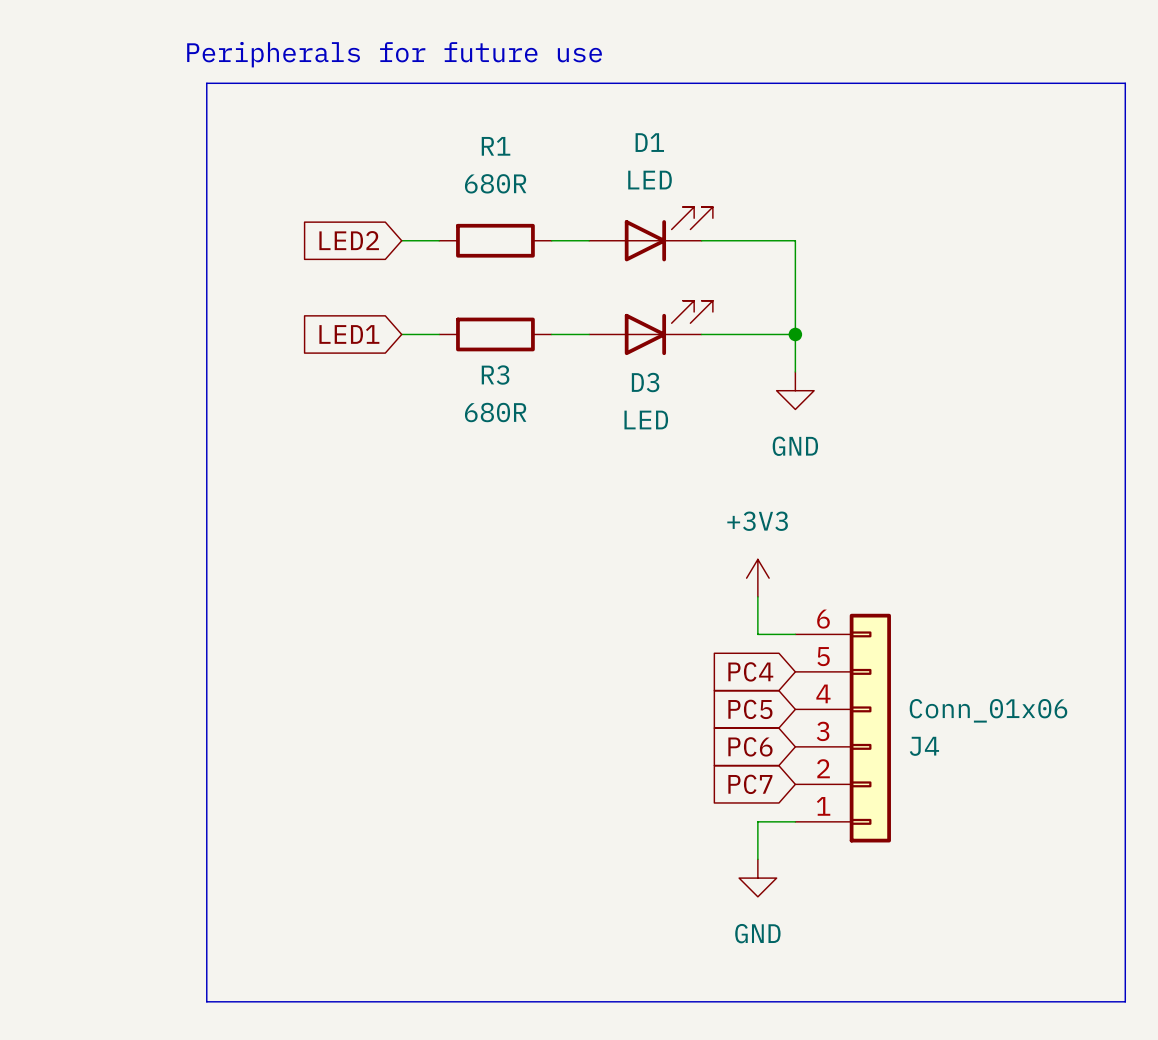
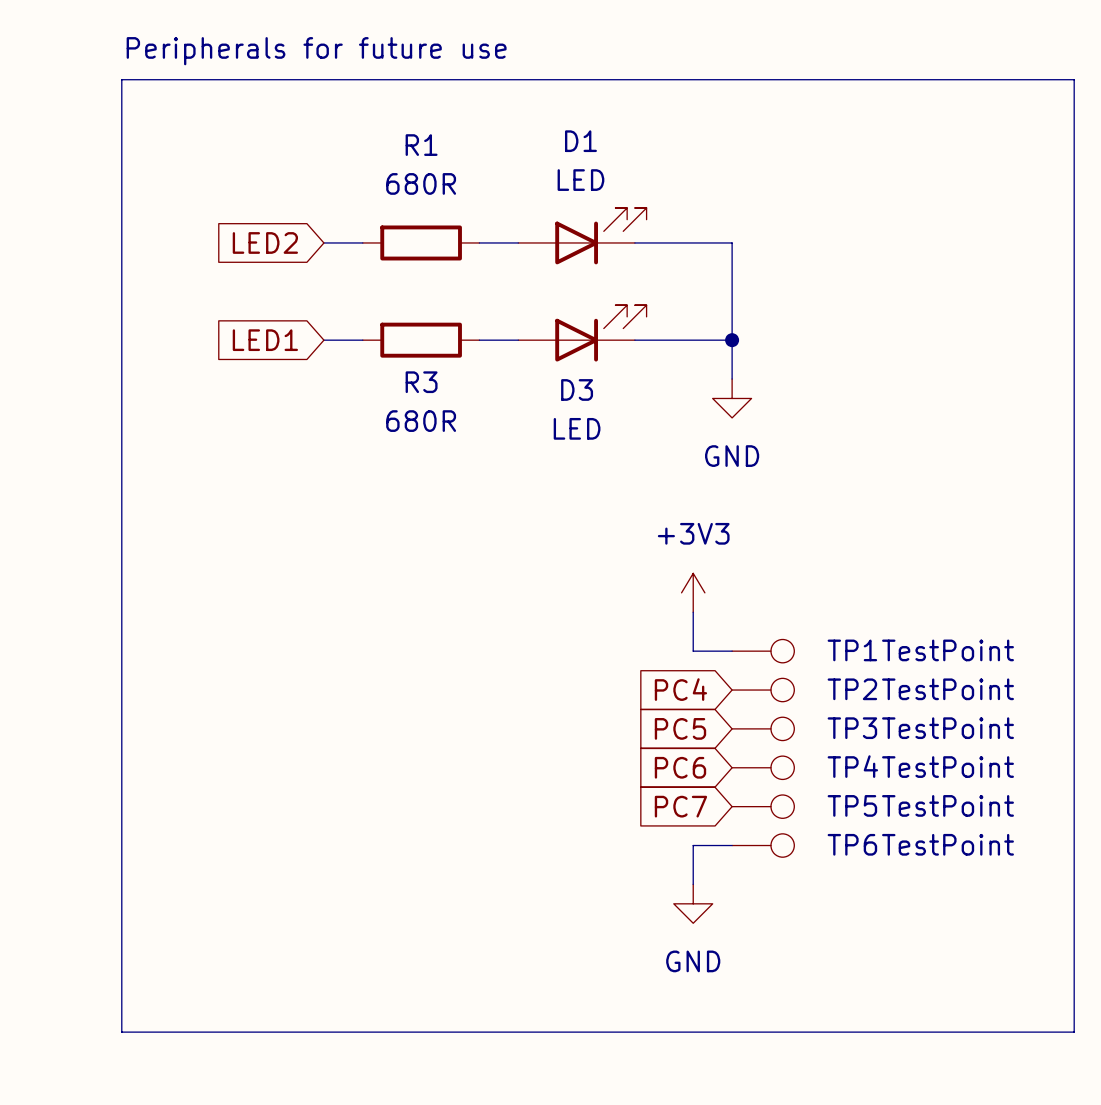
TP1: none -> TestPoint (763, 651)
TP2: none -> TestPoint (763, 690)
TP3: none -> TestPoint (763, 728)
J4: Conn_01x06 (843, 728) -> none
TP4: none -> TestPoint (763, 767)
TP5: none -> TestPoint (763, 806)
TP6: none -> TestPoint (763, 845)

